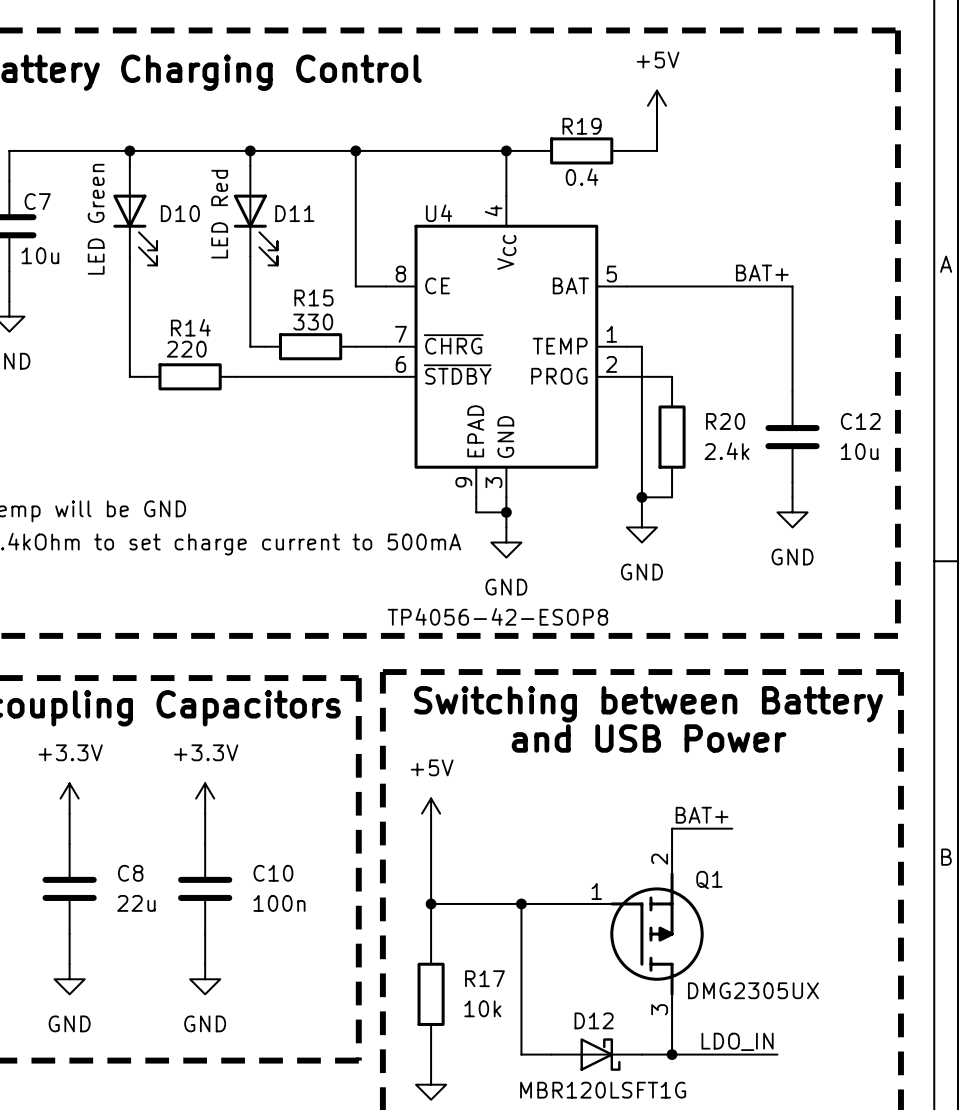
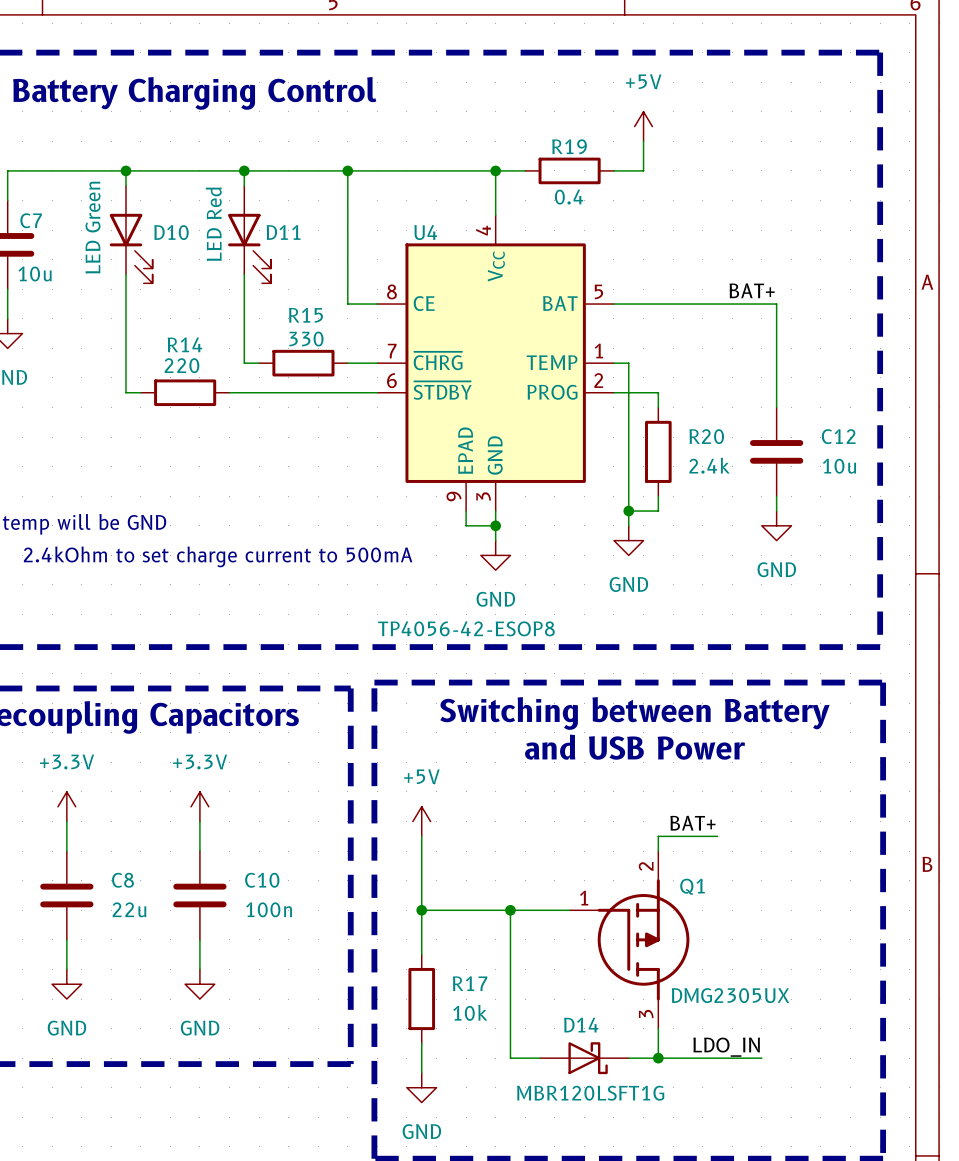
D12 name: D12 (594, 1020) -> D14 (581, 1025)

